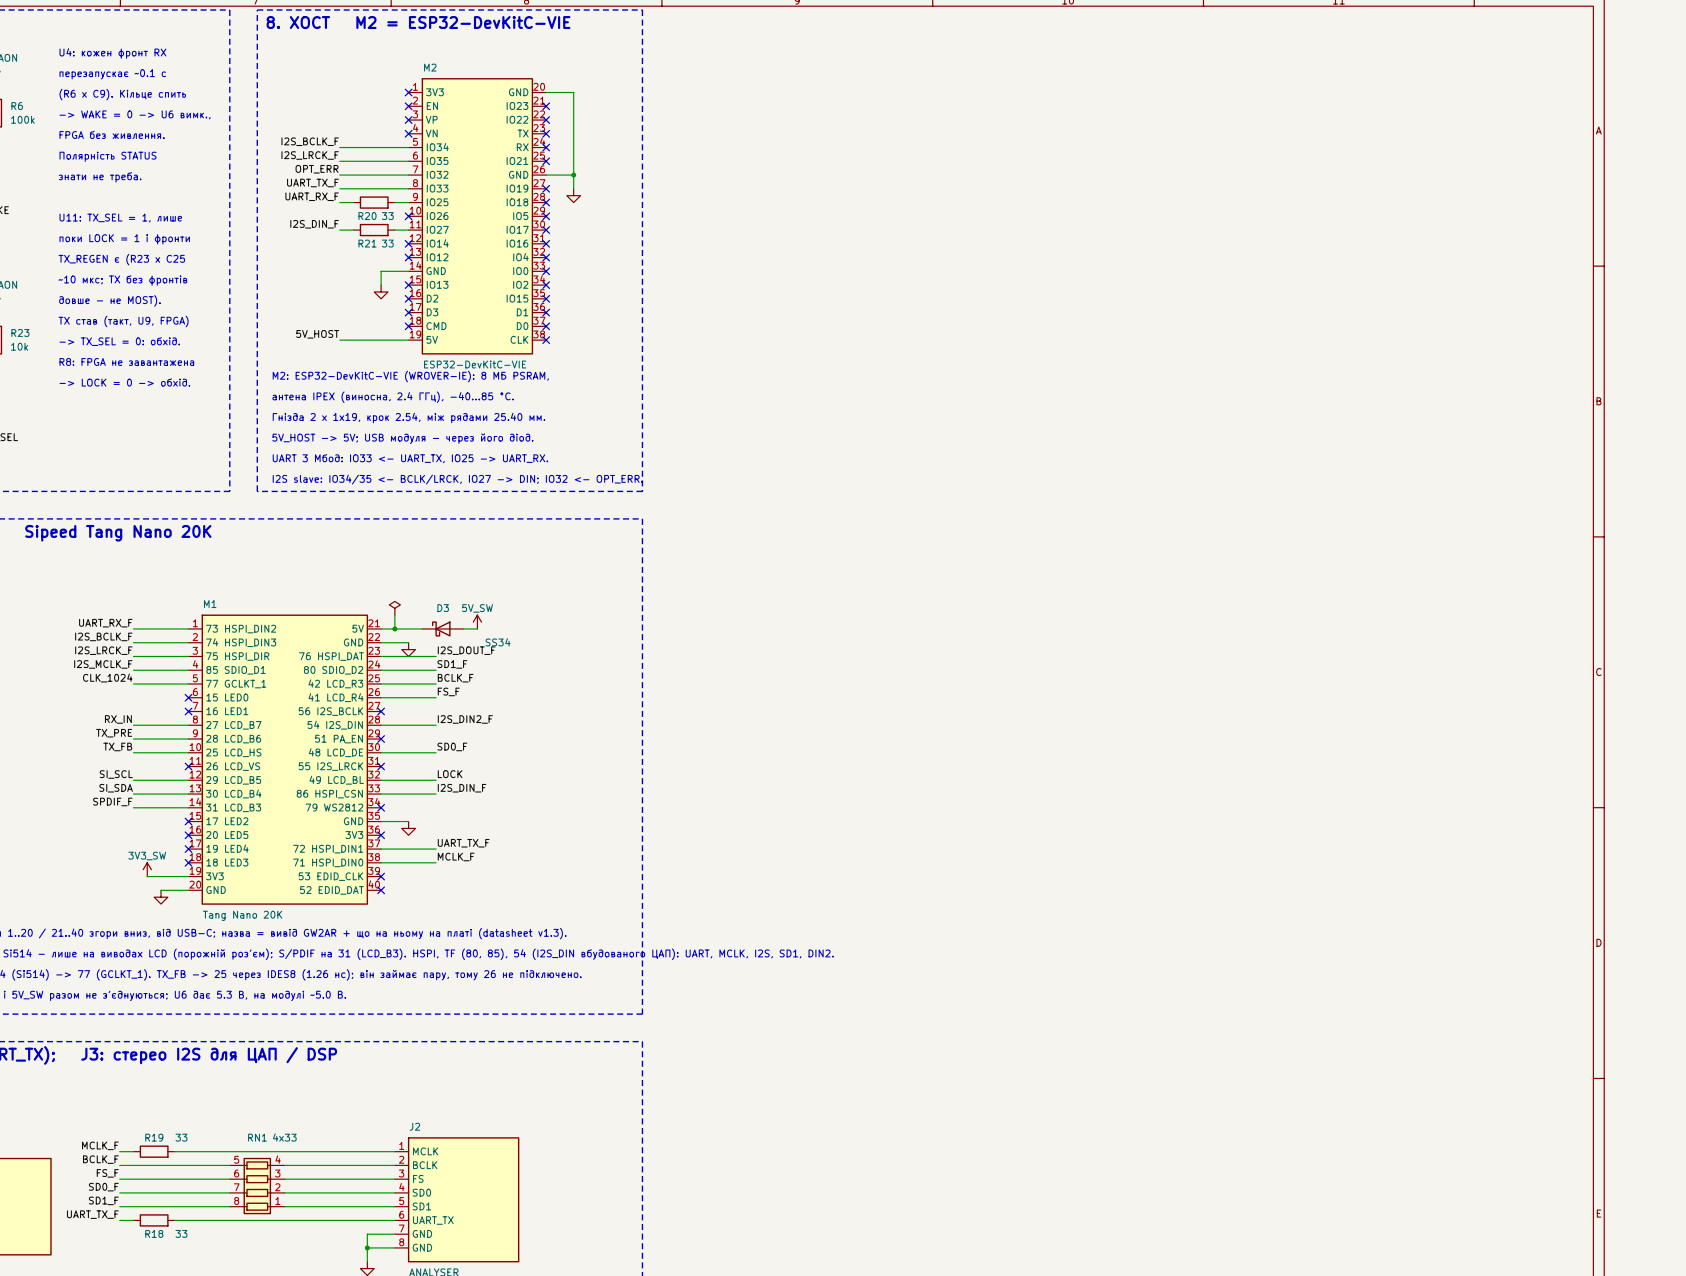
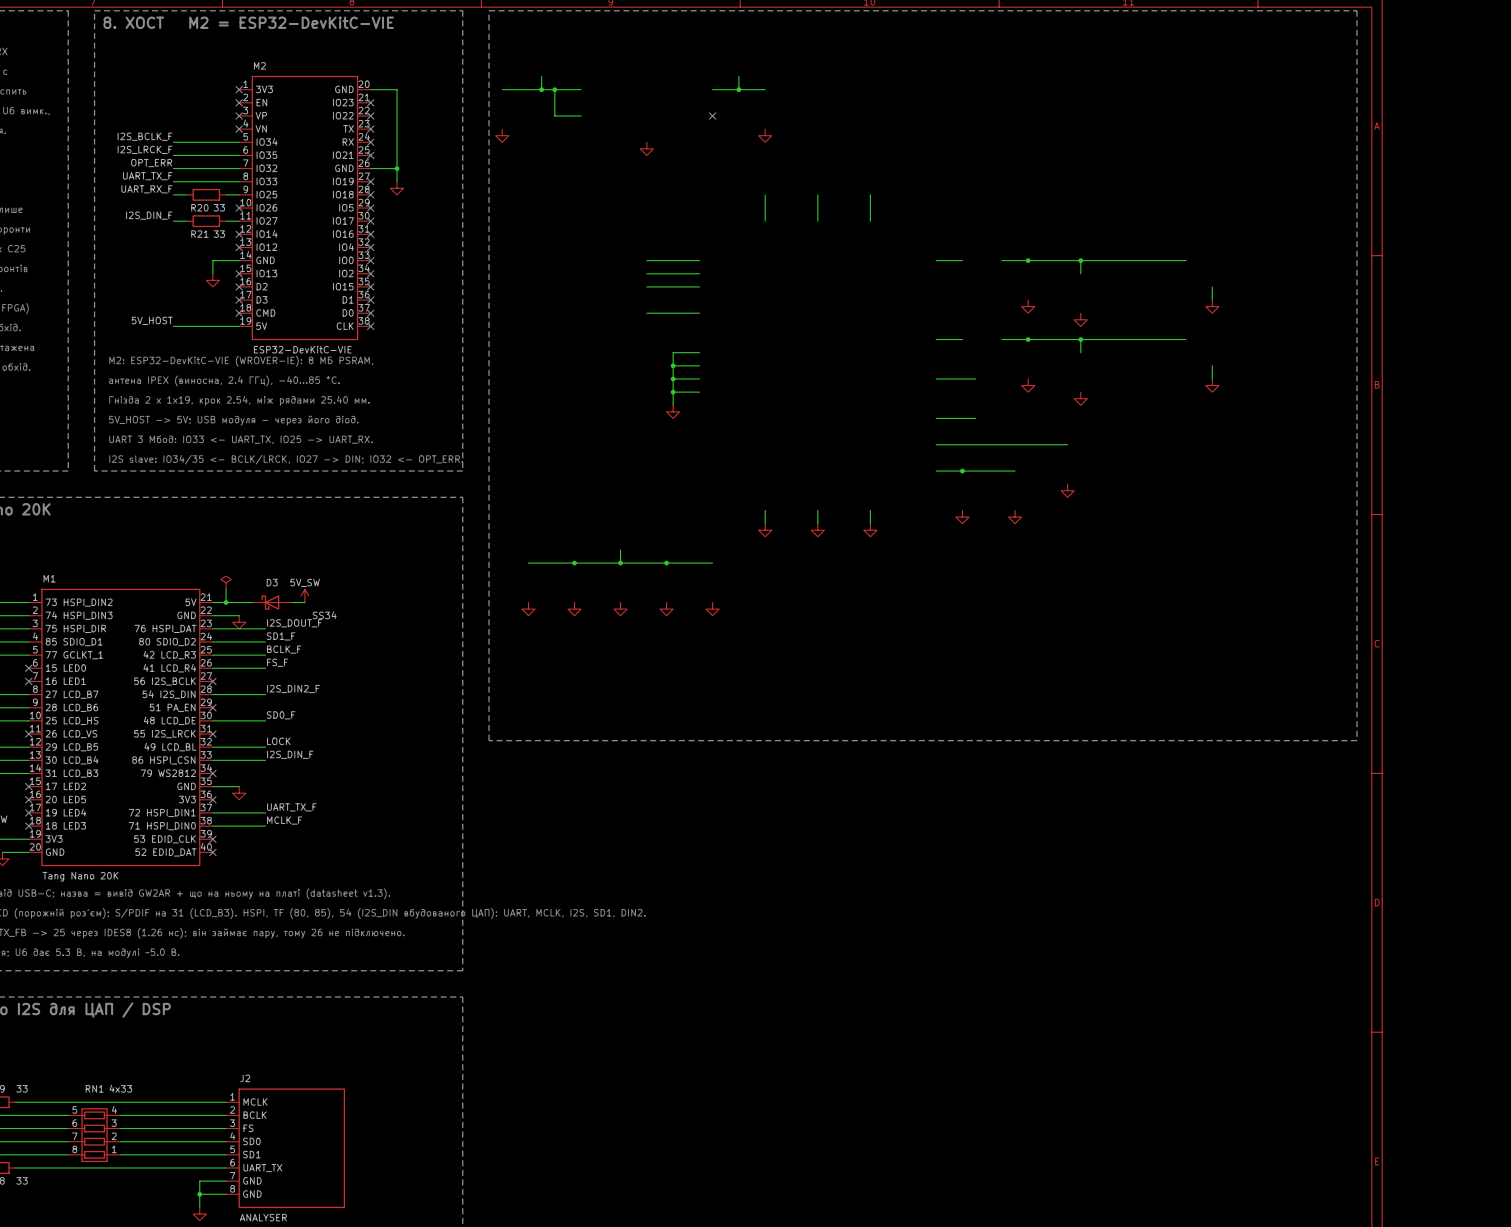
line: none -> (489, 10) (1356, 10) (1356, 740) (489, 740) (489, 10)
wire: none -> (541, 76) (541, 89)
wire: none -> (738, 76) (738, 89)
wire: none -> (502, 89) (581, 89)
junction: none -> (541, 89)
wire: none -> (554, 89) (554, 115) (581, 115)
junction: none -> (554, 89)
wire: none -> (712, 89) (765, 89)
junction: none -> (738, 89)
no-connect mark: none -> (712, 115)
power symbol: none -> (502, 135)
power symbol: none -> (765, 135)
power symbol: none -> (646, 148)
wire: none -> (765, 194) (765, 221)
wire: none -> (817, 194) (817, 221)
wire: none -> (870, 194) (870, 221)
wire: none -> (646, 260) (699, 260)
wire: none -> (936, 260) (962, 260)
wire: none -> (1001, 260) (1186, 260)
junction: none -> (1028, 260)
wire: none -> (1080, 260) (1080, 273)
junction: none -> (1080, 260)
wire: none -> (646, 273) (699, 273)
wire: none -> (646, 286) (699, 286)
wire: none -> (1212, 286) (1212, 300)
power symbol: none -> (1028, 306)
power symbol: none -> (1212, 306)
wire: none -> (646, 313) (699, 313)
power symbol: none -> (1080, 319)
wire: none -> (936, 339) (962, 339)
wire: none -> (1001, 339) (1186, 339)
junction: none -> (1028, 339)
wire: none -> (1080, 339) (1080, 352)
junction: none -> (1080, 339)
wire: none -> (699, 352) (673, 352) (673, 405)
wire: none -> (673, 365) (699, 365)
junction: none -> (673, 365)
wire: none -> (1212, 365) (1212, 378)
wire: none -> (673, 378) (699, 378)
junction: none -> (673, 378)
wire: none -> (936, 378) (975, 378)
power symbol: none -> (1028, 385)
power symbol: none -> (1212, 385)
wire: none -> (673, 392) (699, 392)
junction: none -> (673, 392)
power symbol: none -> (1080, 398)
power symbol: none -> (673, 411)
wire: none -> (936, 418) (975, 418)
wire: none -> (936, 444) (1067, 444)
wire: none -> (936, 471) (1015, 471)
junction: none -> (962, 471)
power symbol: none -> (1067, 490)
wire: none -> (765, 510) (765, 523)
wire: none -> (817, 510) (817, 523)
wire: none -> (870, 510) (870, 523)
power symbol: none -> (962, 517)
power symbol: none -> (1015, 517)
power symbol: none -> (765, 530)
power symbol: none -> (817, 530)
power symbol: none -> (870, 530)
wire: none -> (620, 549) (620, 563)
wire: none -> (528, 563) (712, 563)
junction: none -> (574, 563)
junction: none -> (620, 563)
junction: none -> (666, 563)
power symbol: none -> (528, 609)
power symbol: none -> (574, 609)
power symbol: none -> (620, 609)
power symbol: none -> (666, 609)
power symbol: none -> (712, 609)

